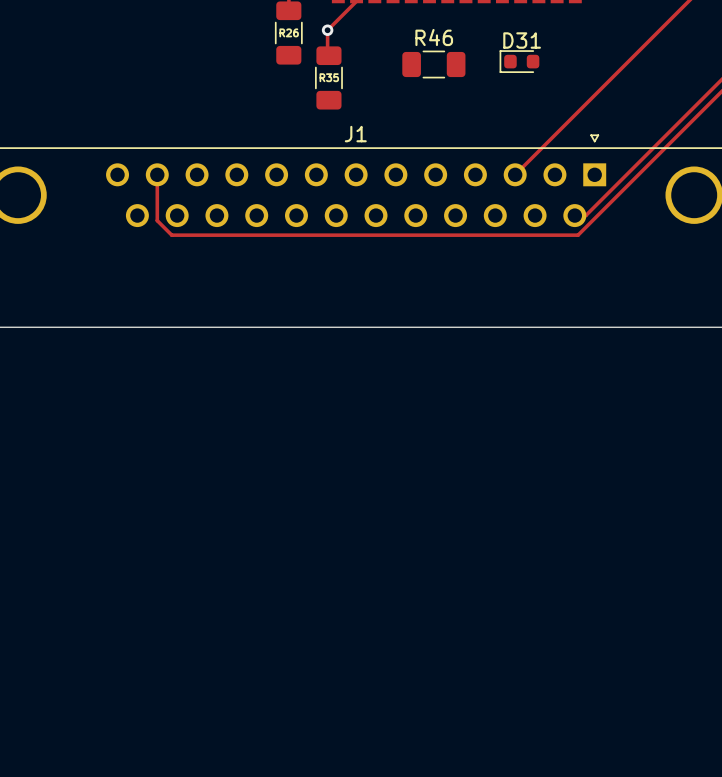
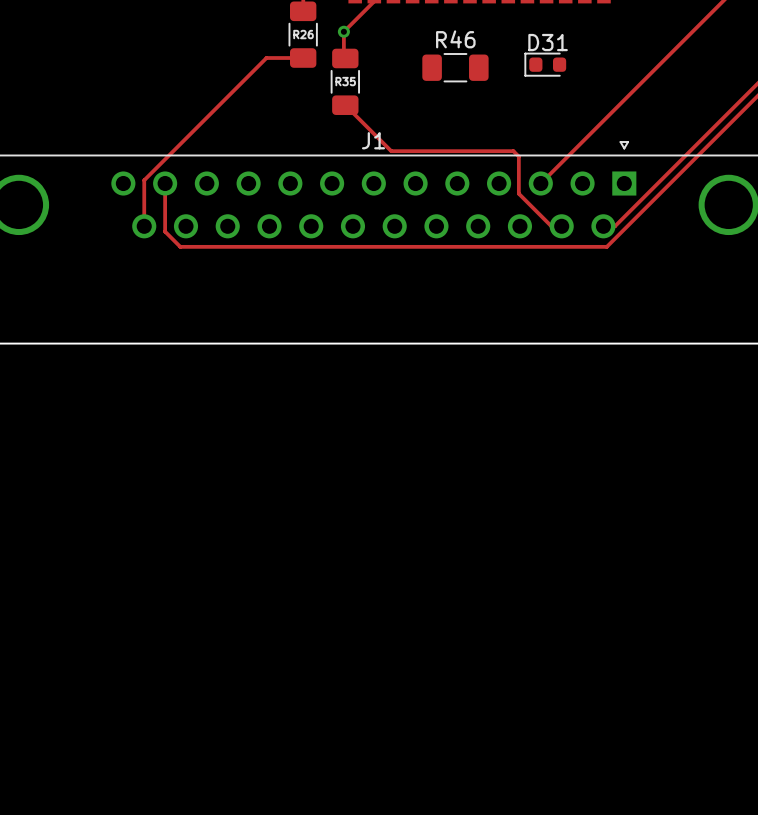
track: none -> (303, 58) (266, 58) (144, 180) (144, 226)
track: none -> (345, 105) (391, 151) (513, 151) (518, 156) (518, 193) (551, 226) (561, 226)

